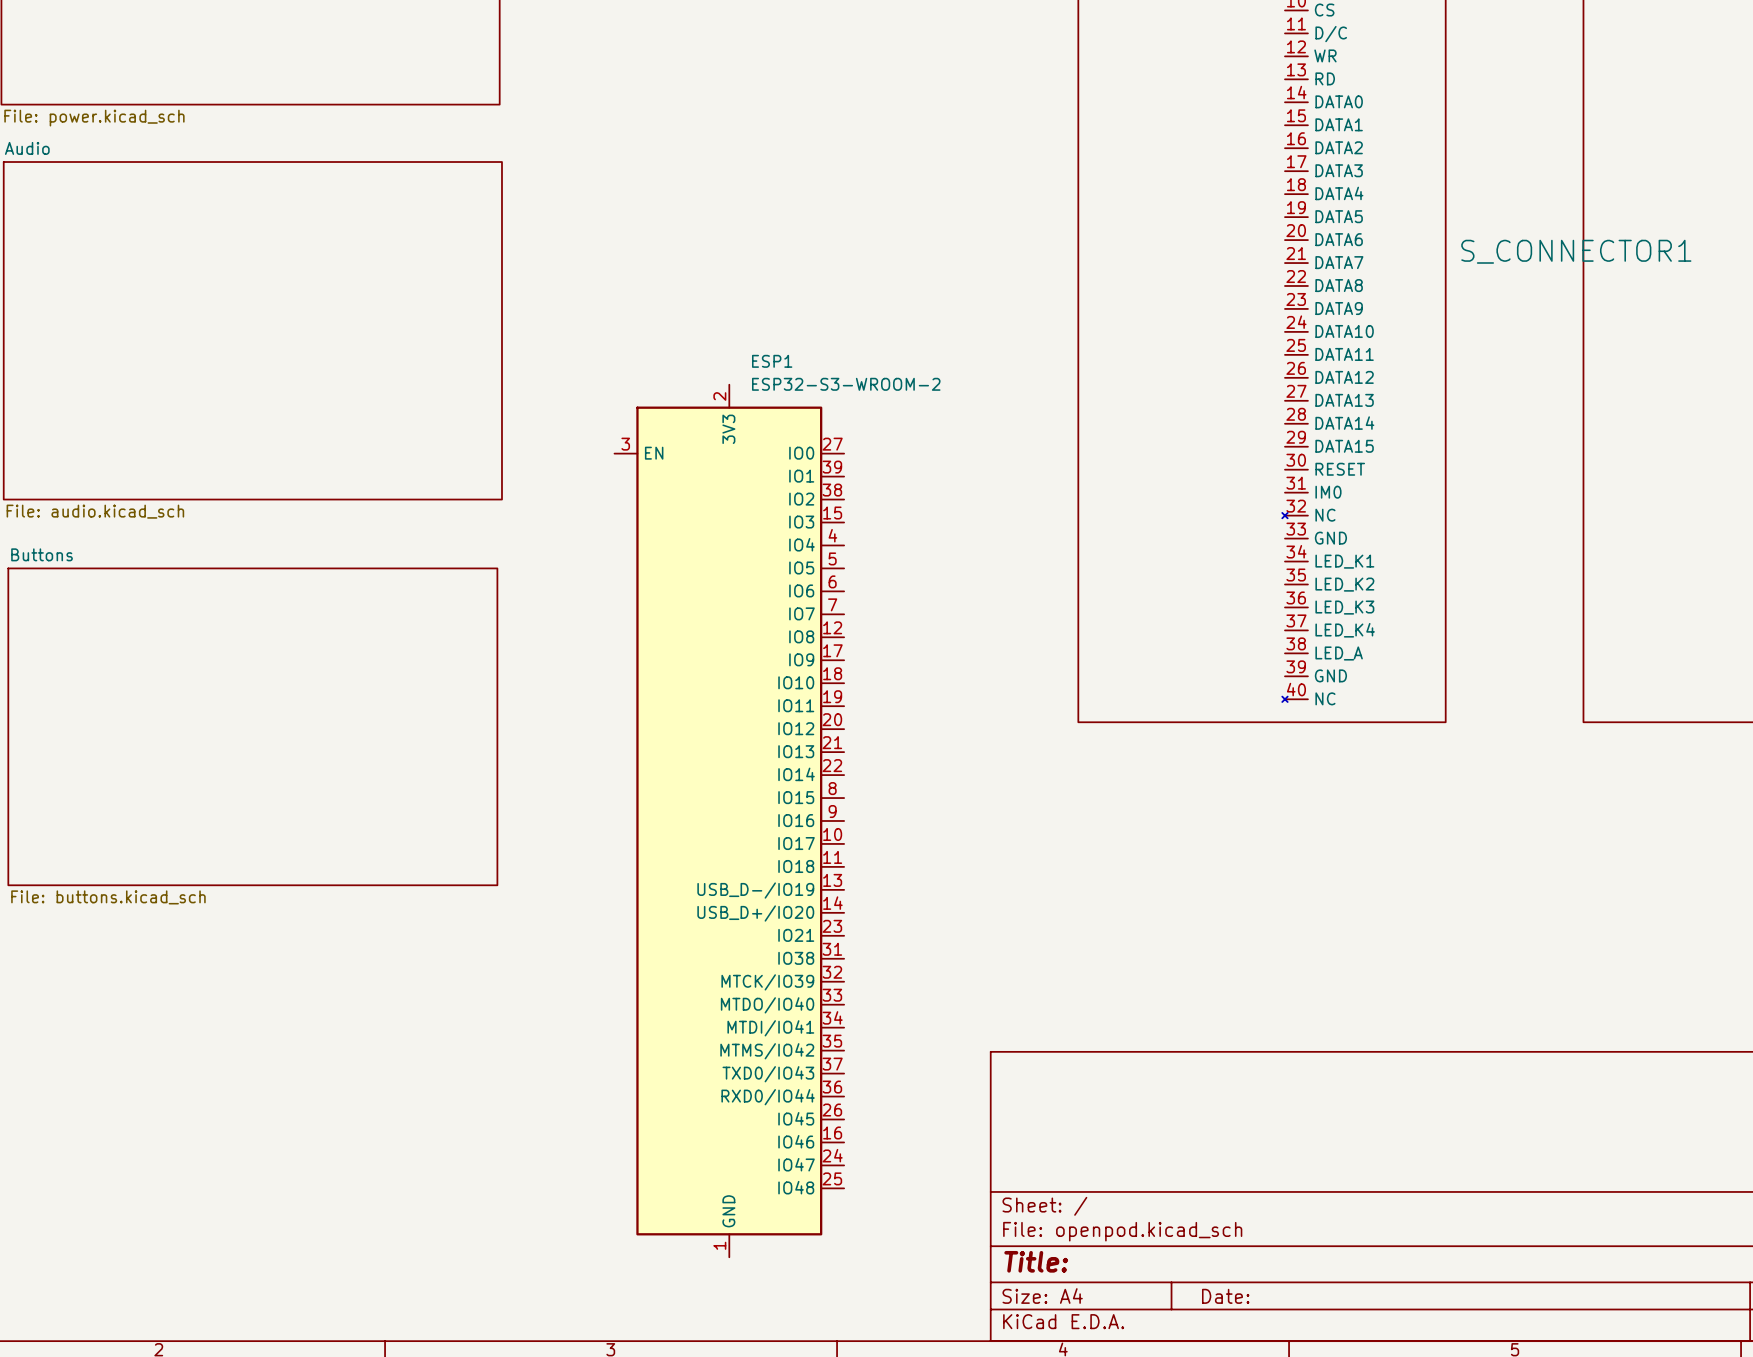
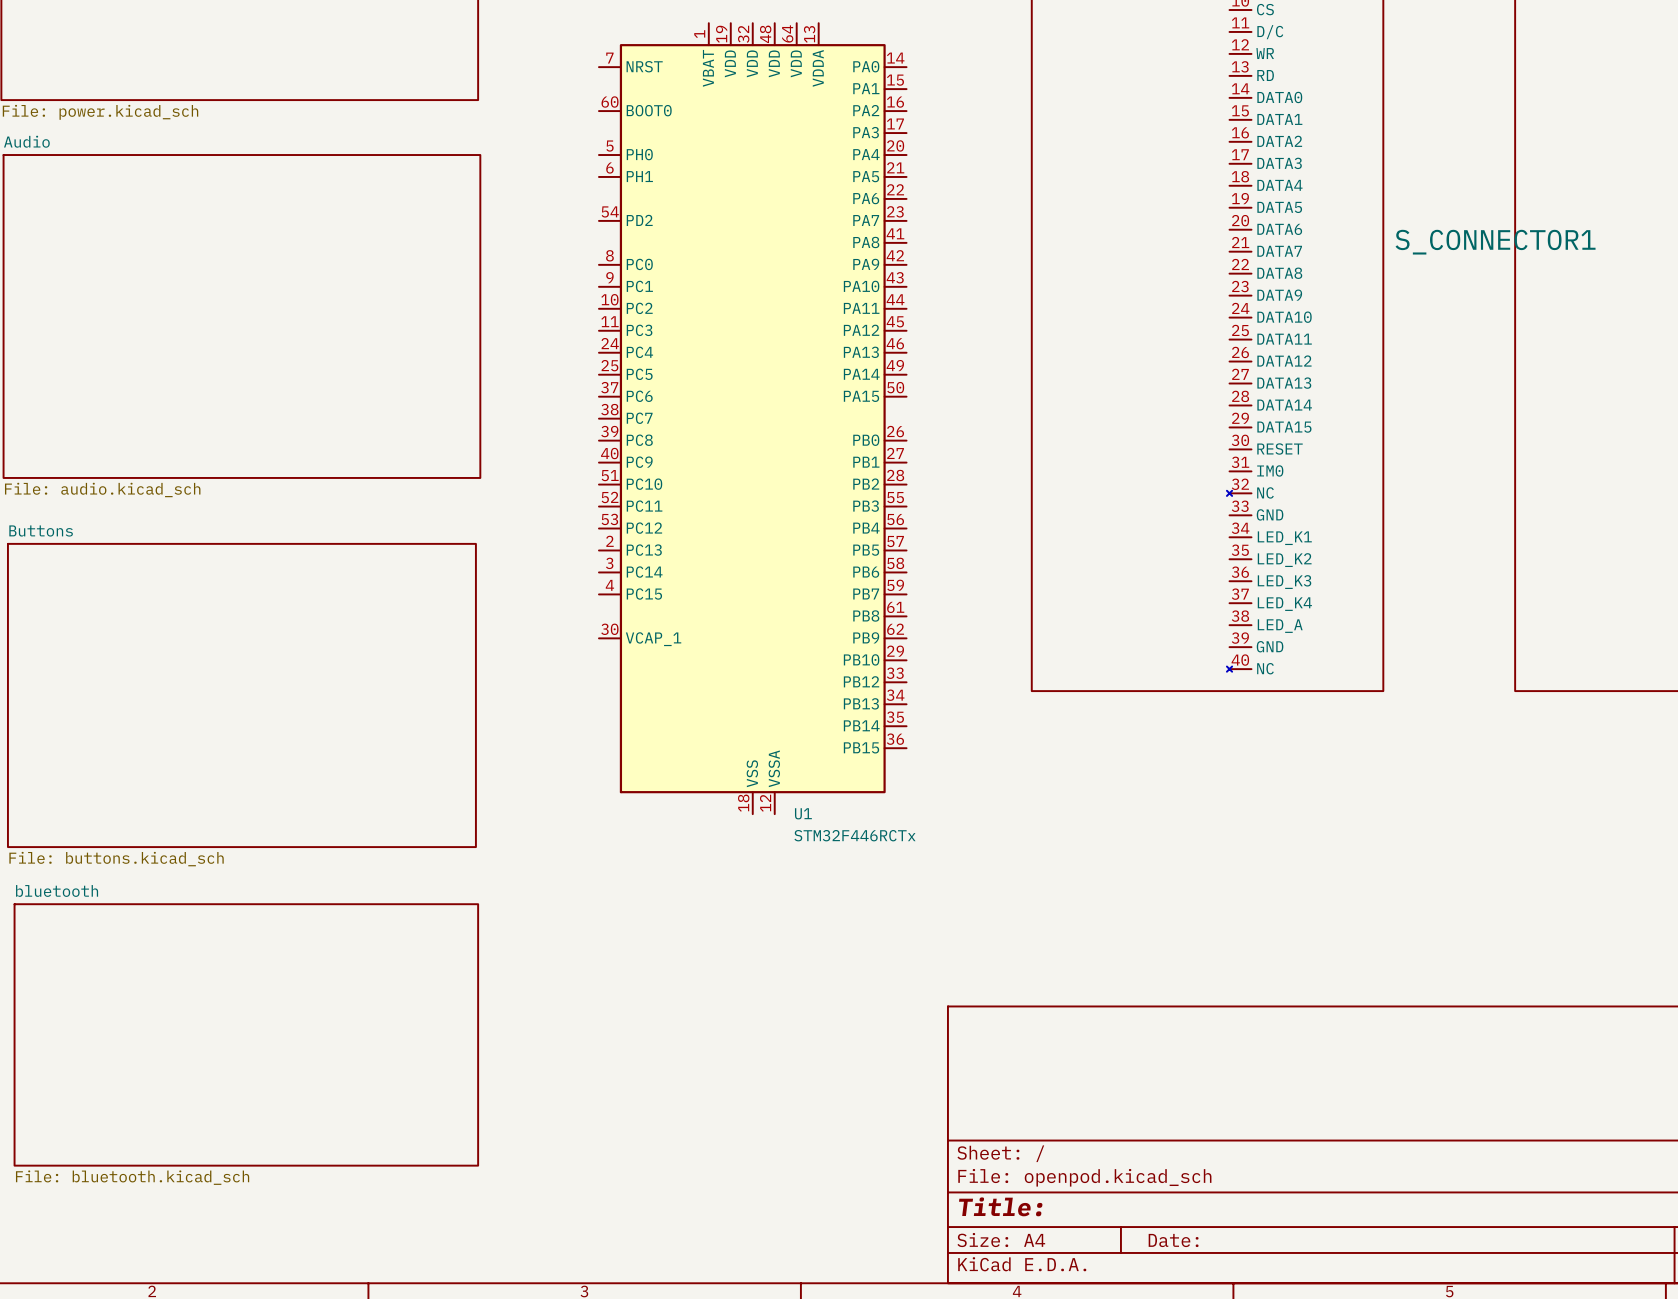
U1: none -> STM32F446RCTx (752, 418)
ESP1: ESP32-S3-WROOM-2 (729, 820) -> none
sheet bluetooth: none -> File: bluetooth.kicad_sch (246, 1034)

